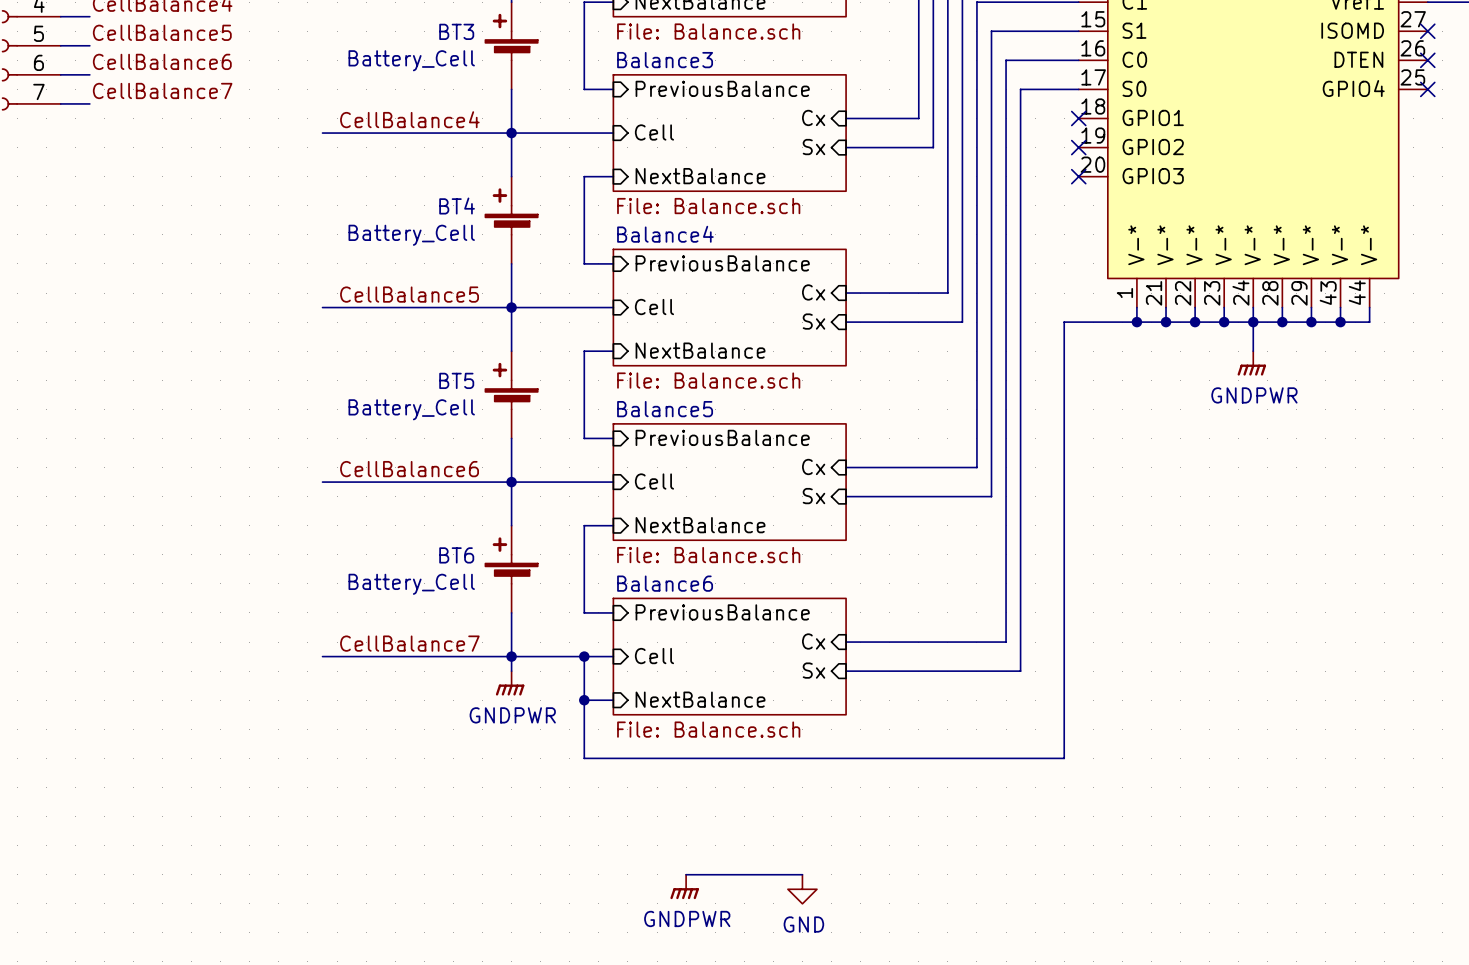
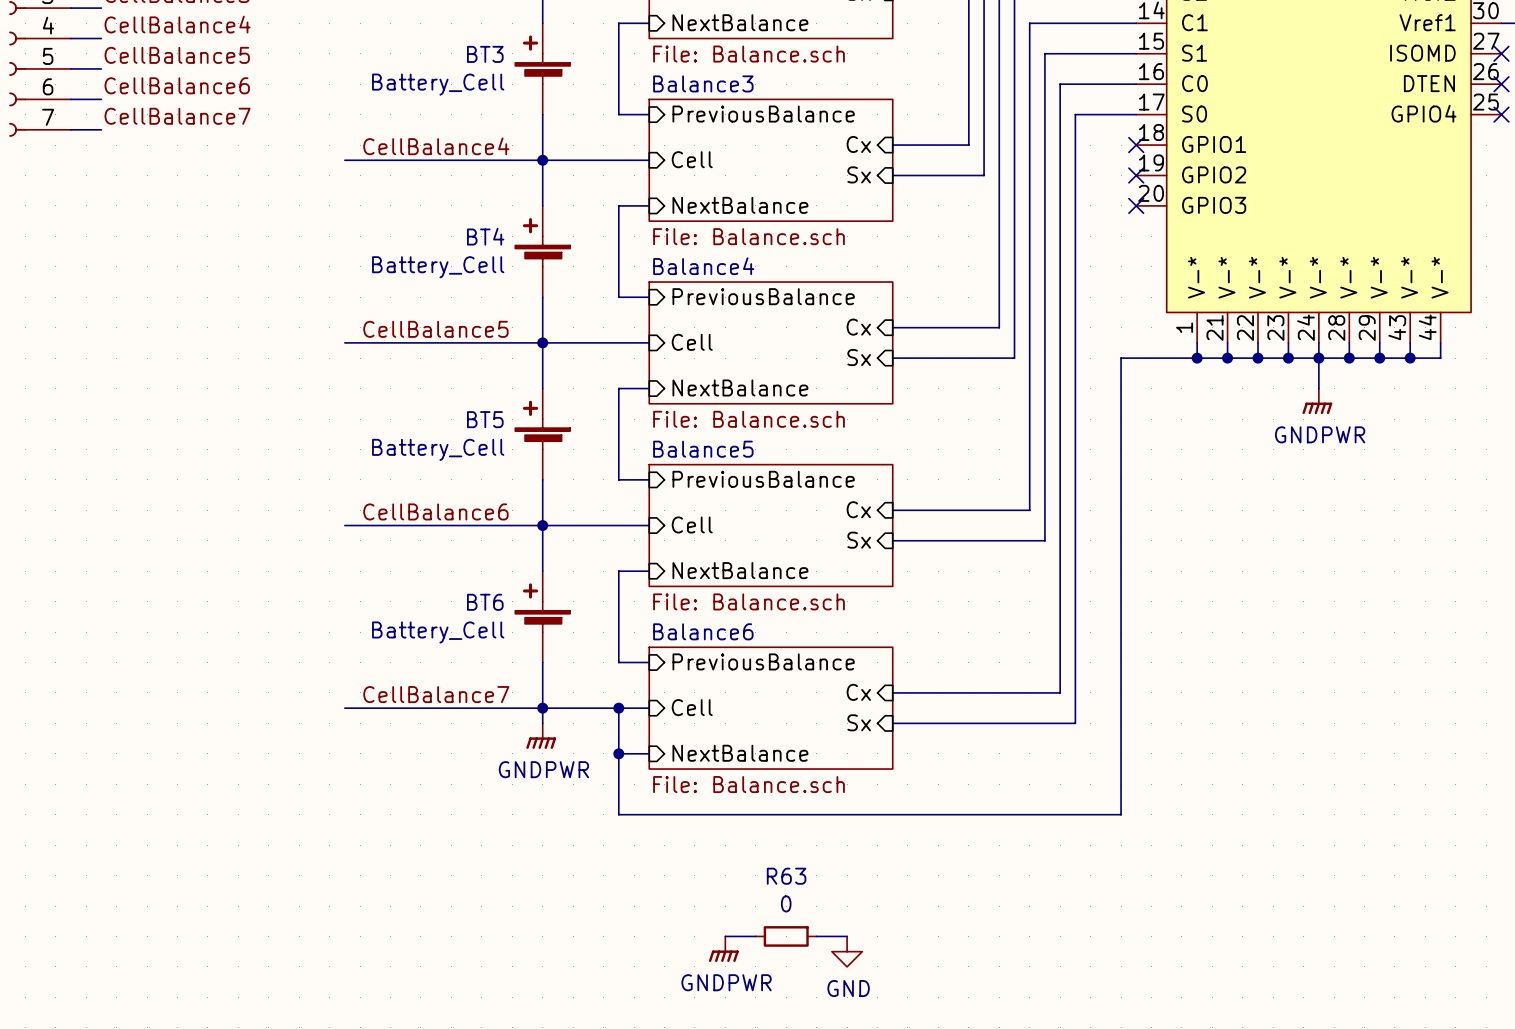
wire: (715, 874) (773, 874) -> none
R63: none -> 0 (786, 936)

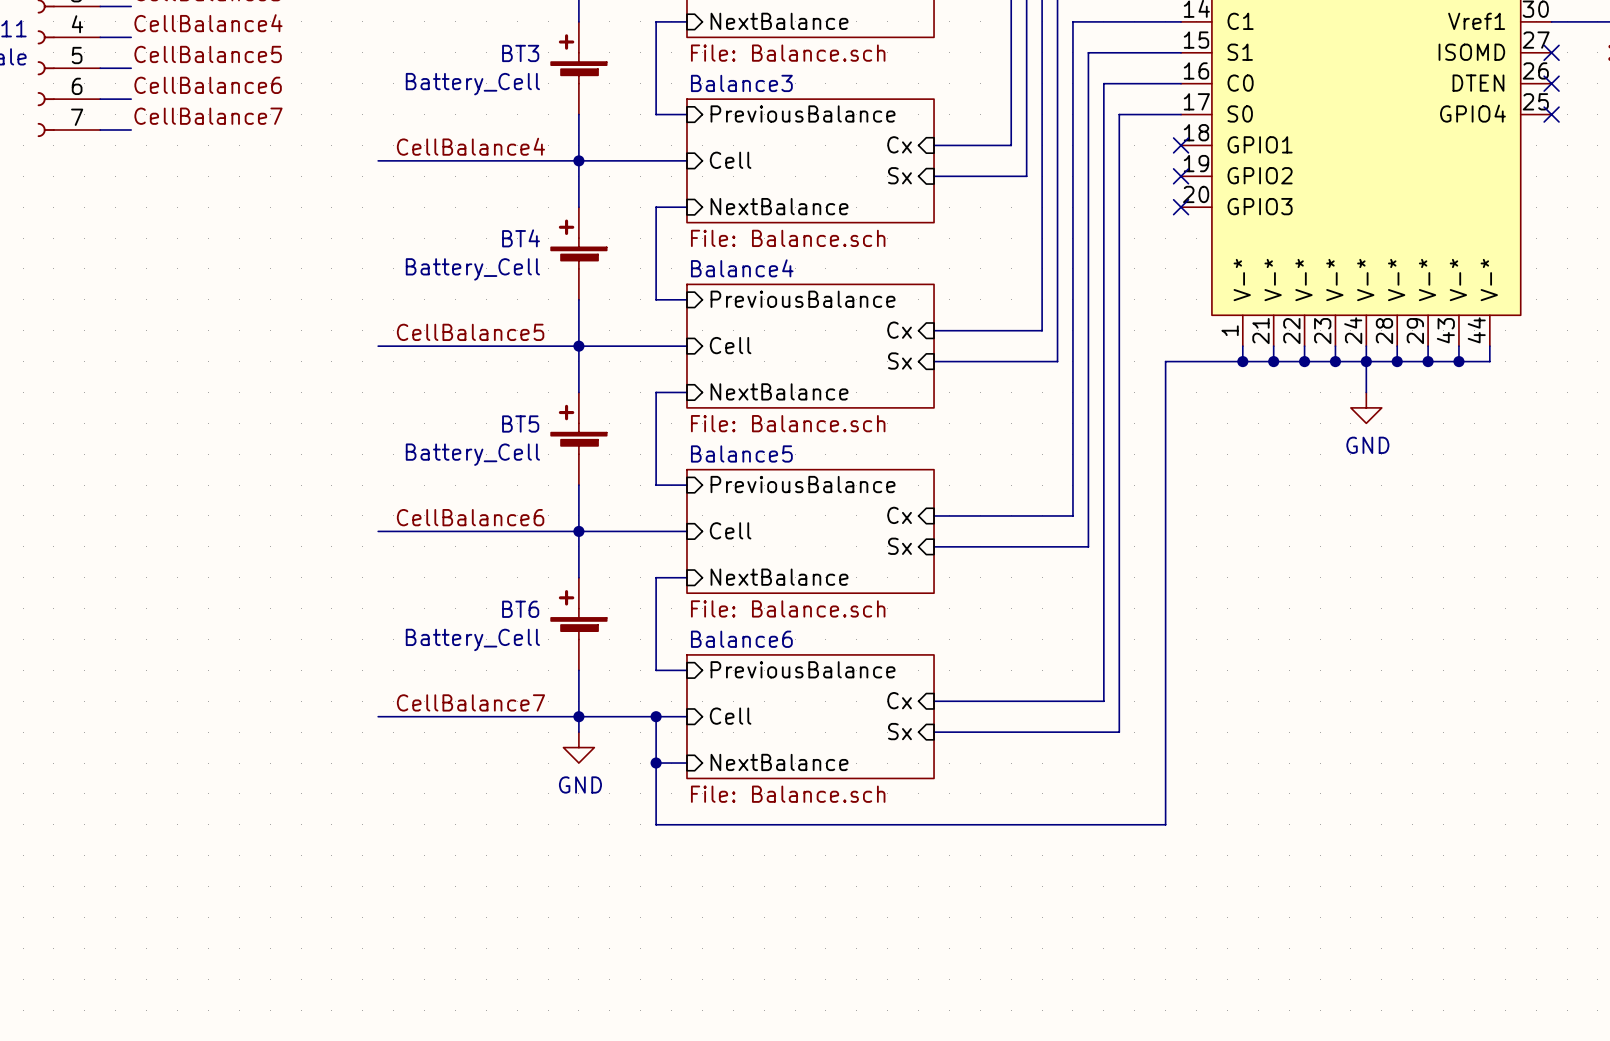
power symbol: GNDPWR (1317, 401) -> GND (1366, 407)
power symbol: GNDPWR (541, 736) -> GND (578, 747)
wire: (725, 936) (755, 936) -> none
R63: 0 (786, 936) -> none
wire: (816, 936) (847, 936) -> none
power symbol: GNDPWR (723, 949) -> none
power symbol: GND (847, 951) -> none

